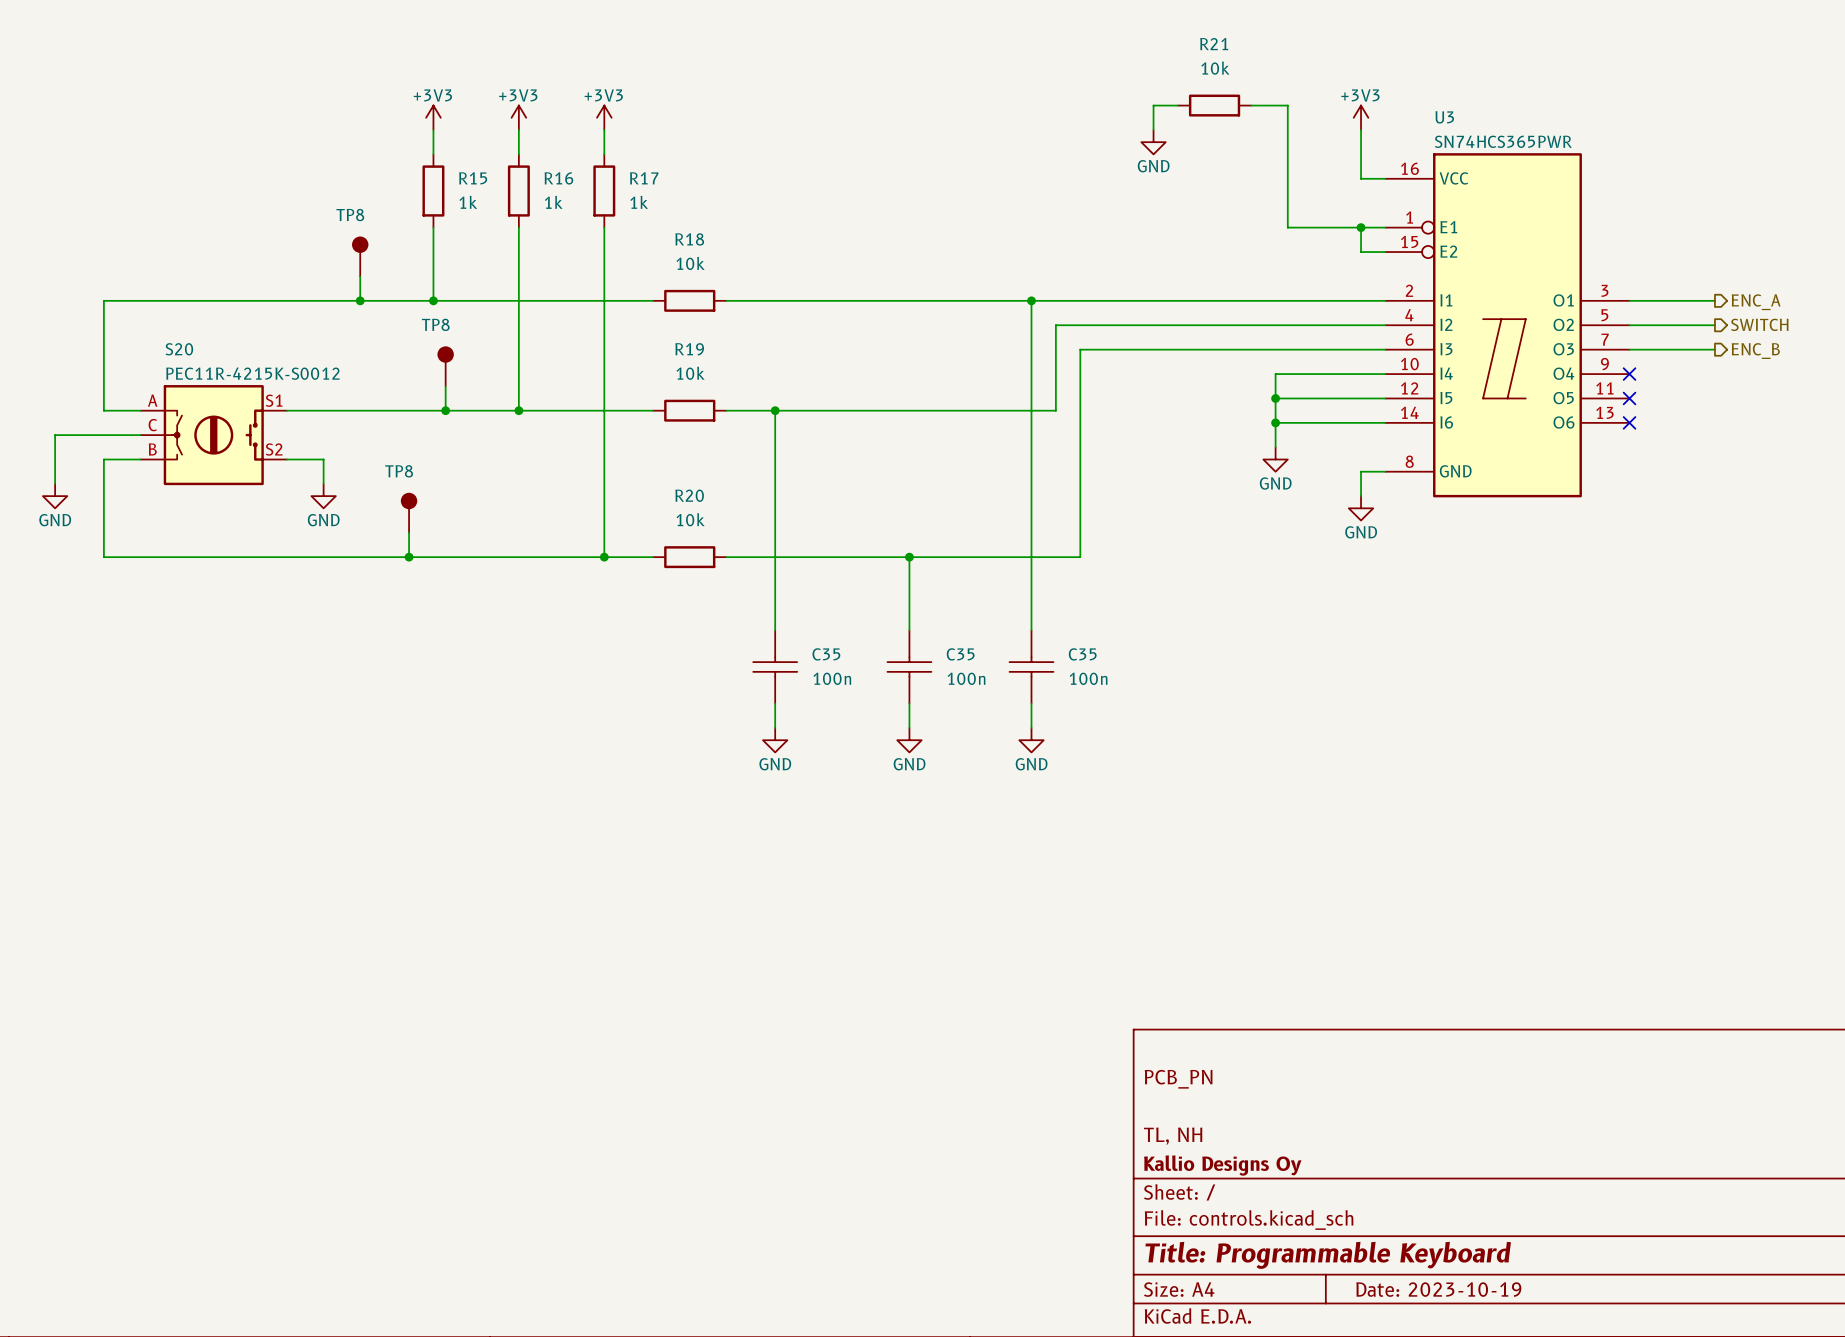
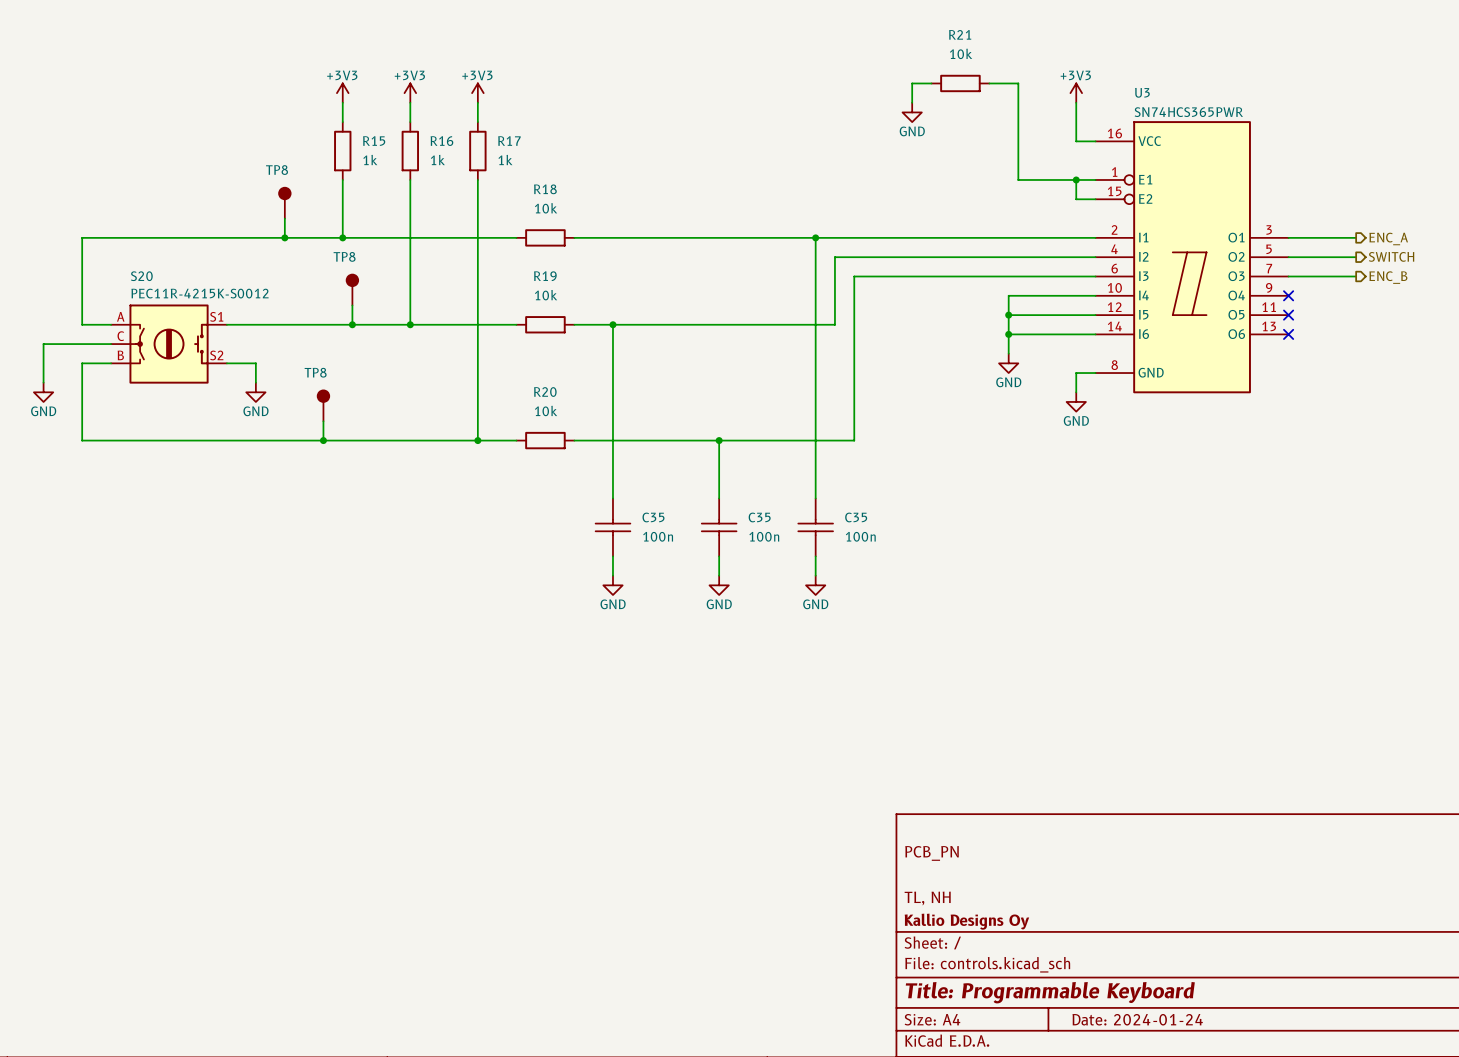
S20 value: none -> PEC11R-4215K-S0012 (199, 293)
S20 text: PEC11R-4215K-S0012 (252, 373) -> none
title block: Date: 2023-10-19 (1438, 1289) -> Date: 2024-01-24 (1137, 1019)

